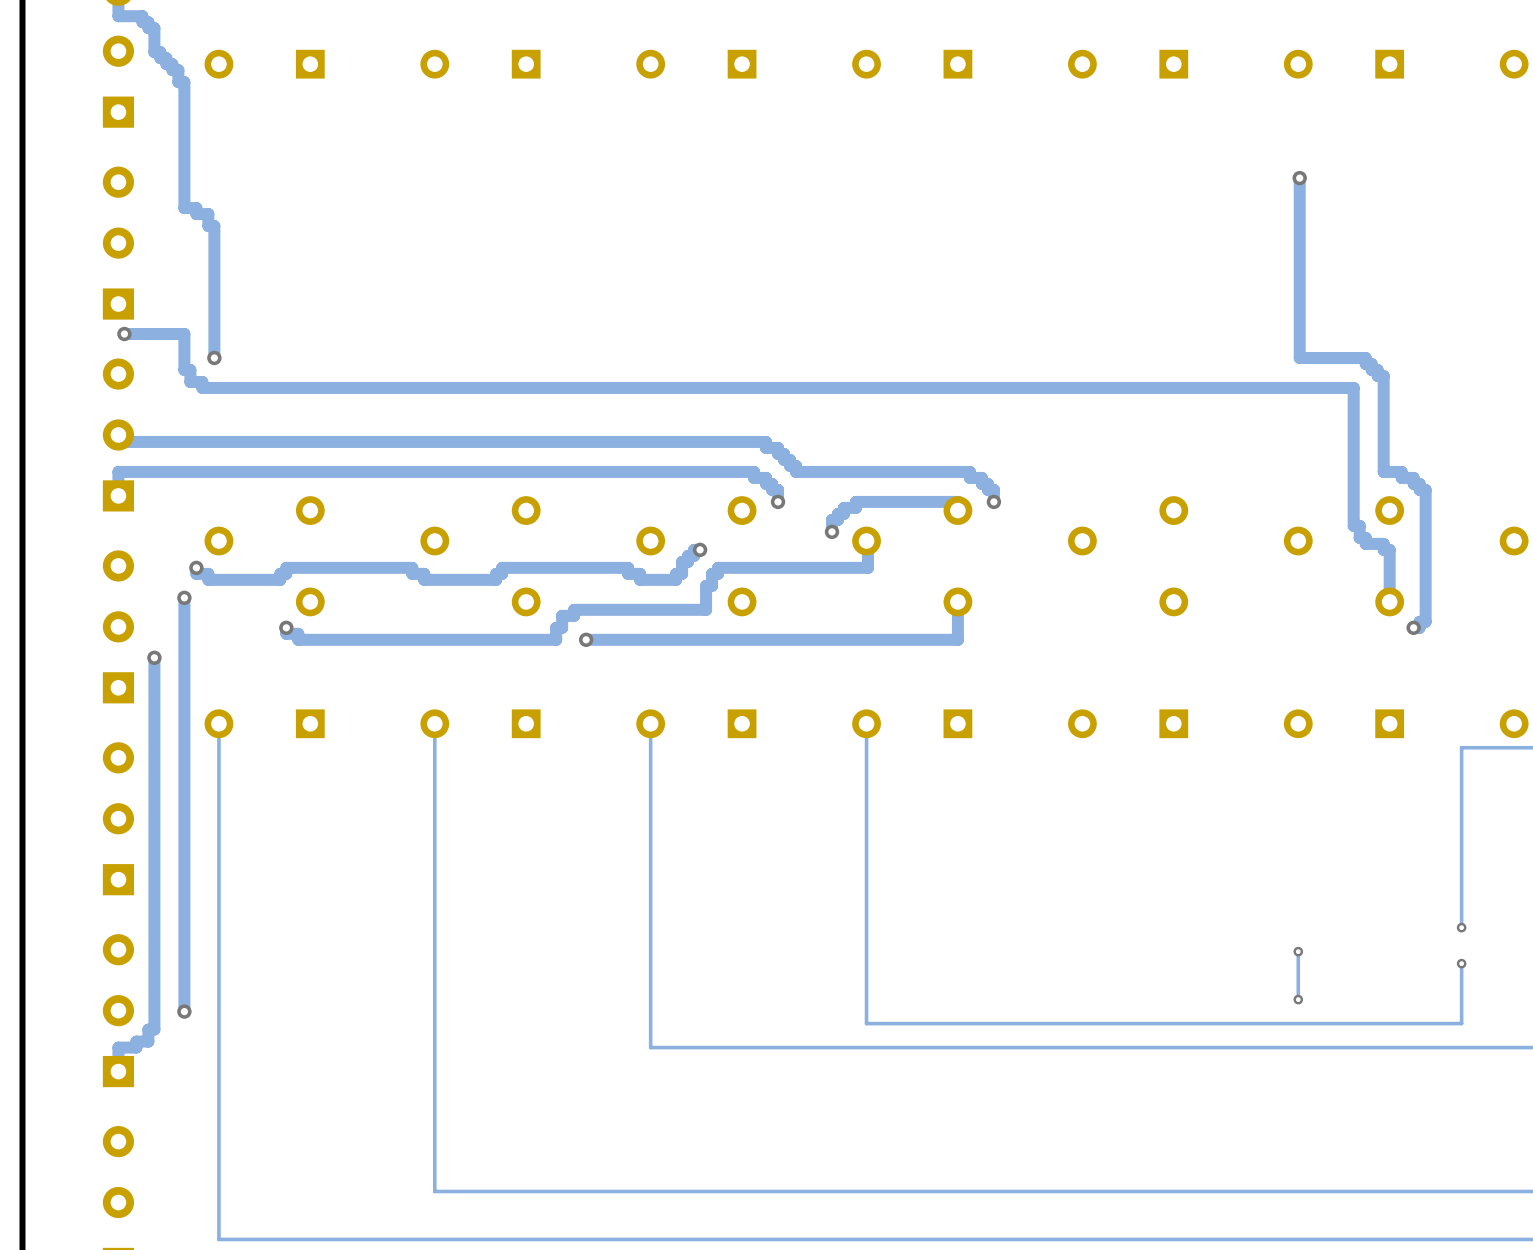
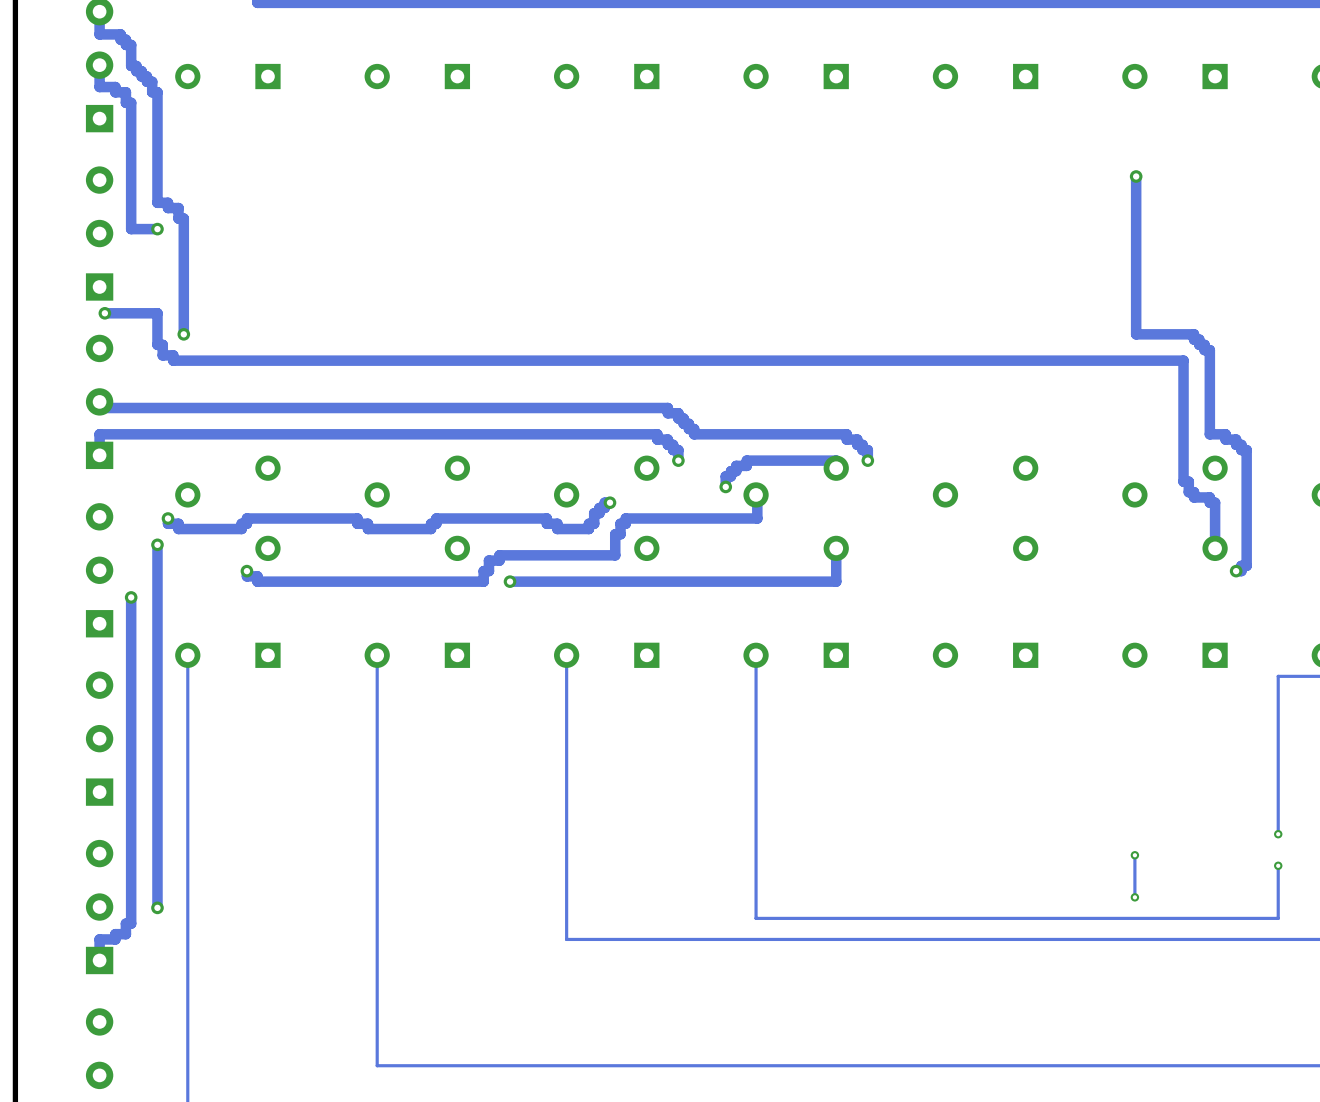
track: none -> (99, 65) (99, 87) (115, 87) (115, 92) (125, 92) (125, 102) (131, 102) (131, 229) (157, 229)
via: none -> (157, 229)

